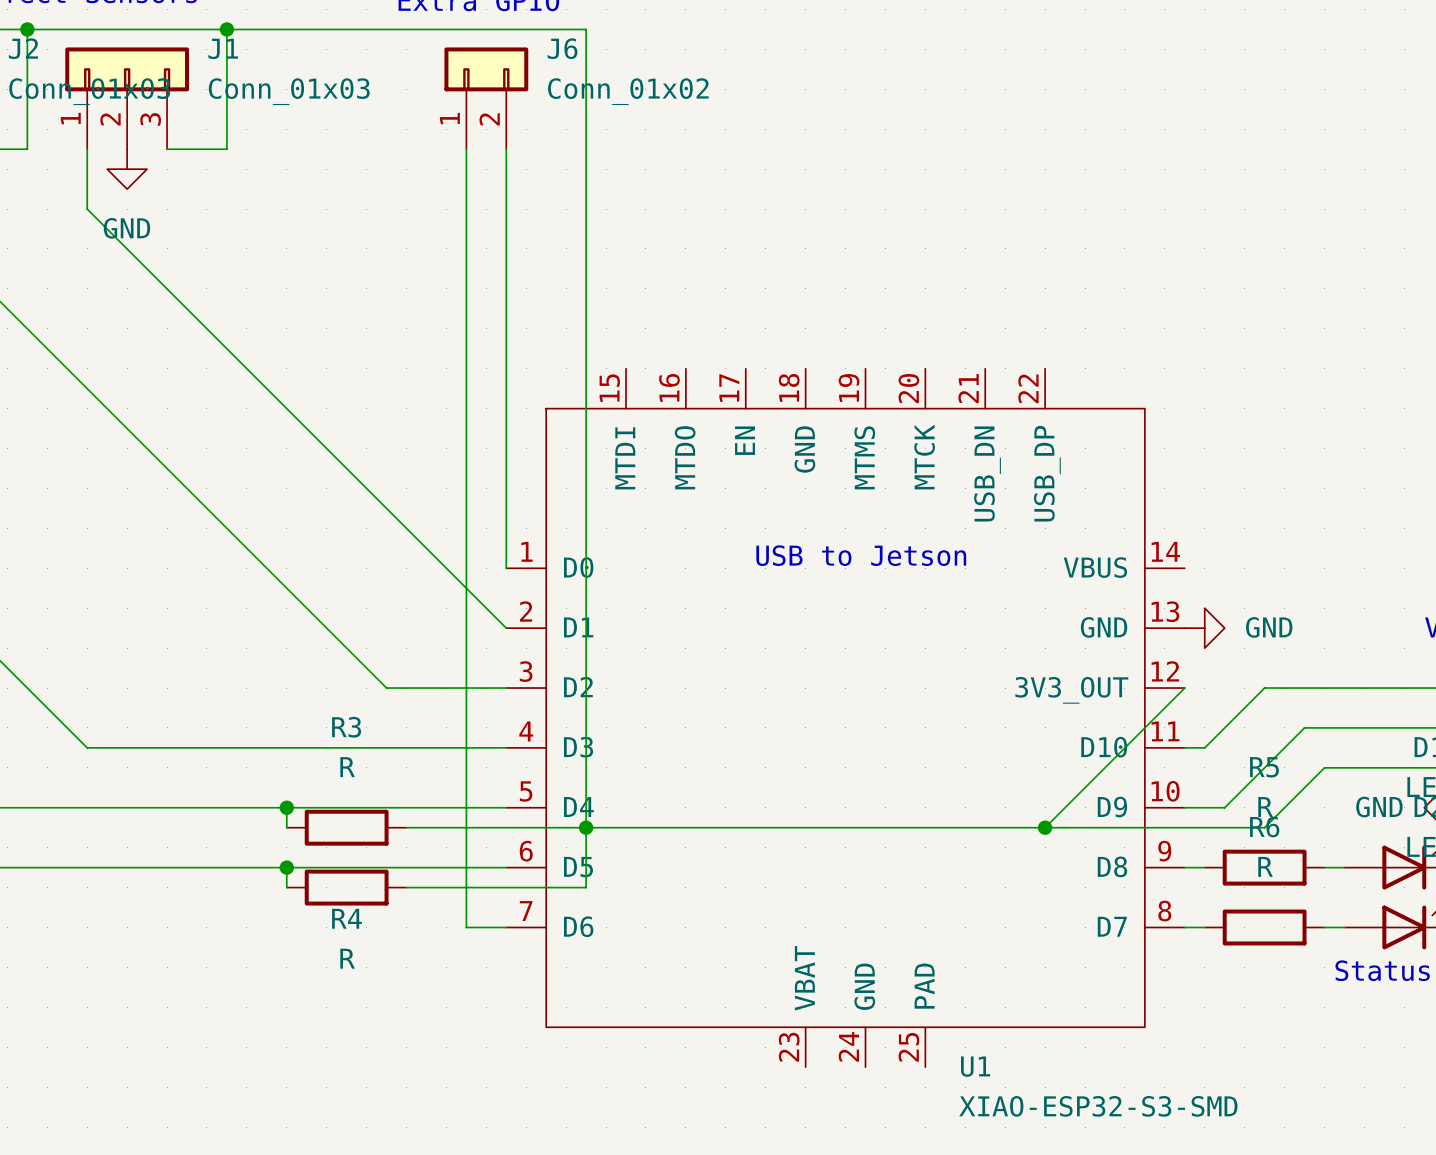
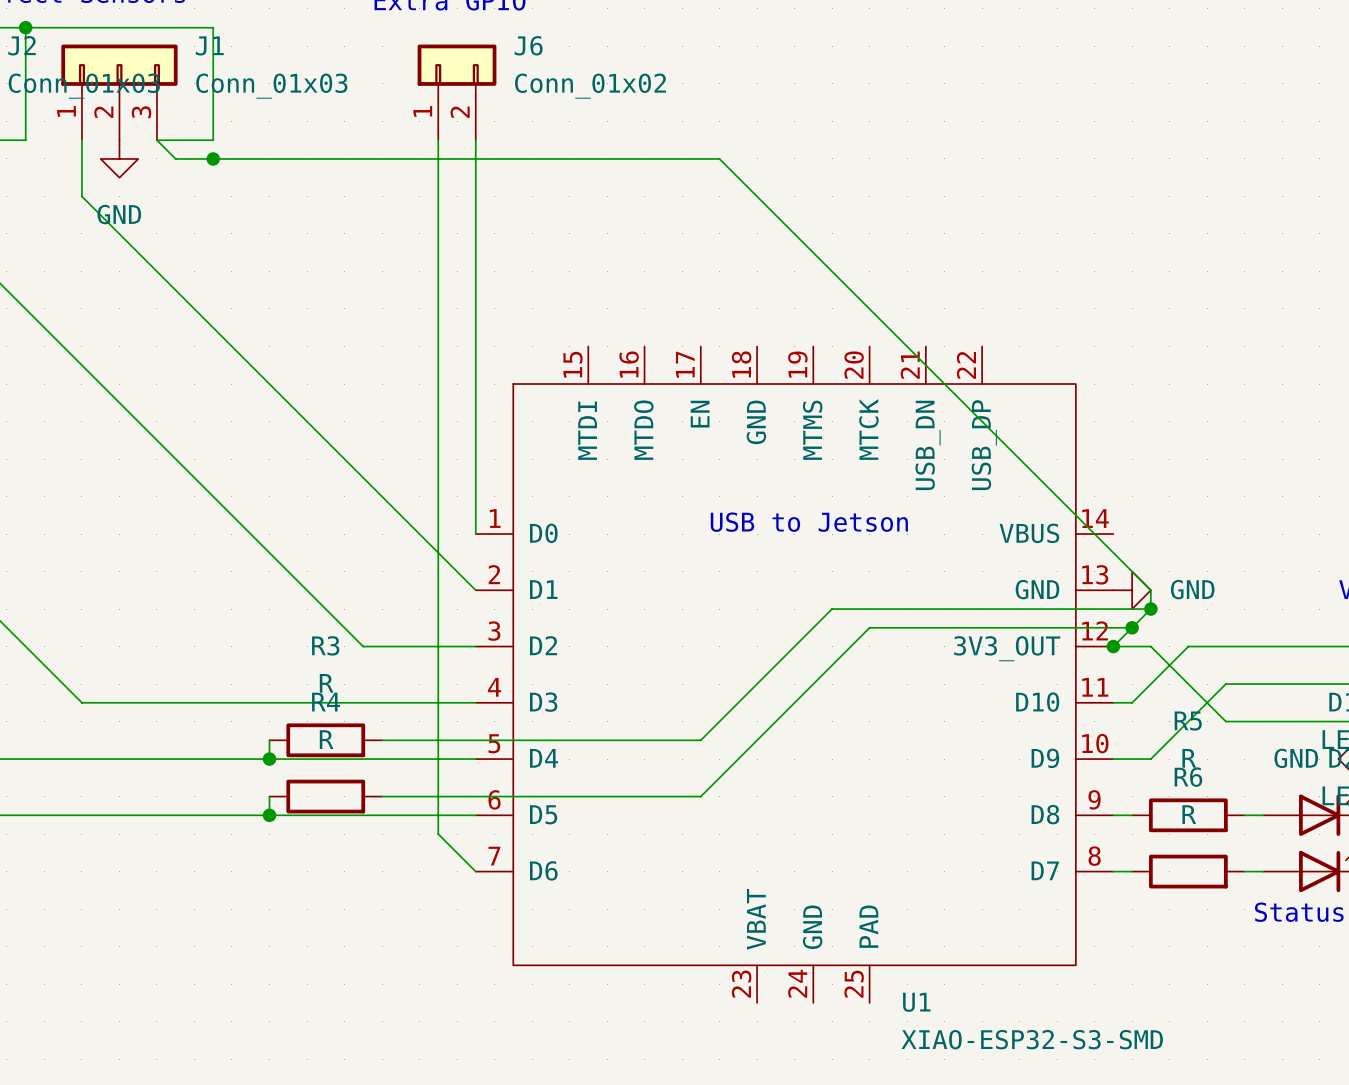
wire: (226, 29) (586, 29) (586, 887) (406, 887) -> none
junction: (226, 29) -> none
wire: none -> (156, 140) (175, 158) (719, 158) (1150, 590) (1150, 609)
junction: none -> (213, 158)
wire: none -> (1150, 609) (832, 609) (700, 740) (382, 740)
junction: none -> (1150, 609)
wire: none -> (1132, 627) (869, 627) (700, 796) (382, 796)
junction: none -> (1132, 627)
wire: (1184, 688) (1045, 827) -> none
junction: none -> (1113, 646)
wire: (1324, 767) (1264, 827) (406, 827) -> (1244, 721) (1225, 721) (1150, 646) (1113, 646) (1150, 609)
wire: (286, 807) (286, 827) -> (269, 759) (269, 740)
R3 position: (346, 827) -> (325, 740)
junction: (586, 827) -> none
junction: (1045, 827) -> none
wire: (286, 867) (286, 887) -> (269, 815) (269, 796)
R4 position: (346, 887) -> (325, 796)
wire: (466, 887) (466, 927) (506, 927) -> (438, 834) (475, 871)
R4 name position: R4 (346, 918) -> R4 (326, 702)
R4 value position: R (347, 958) -> R (326, 739)

